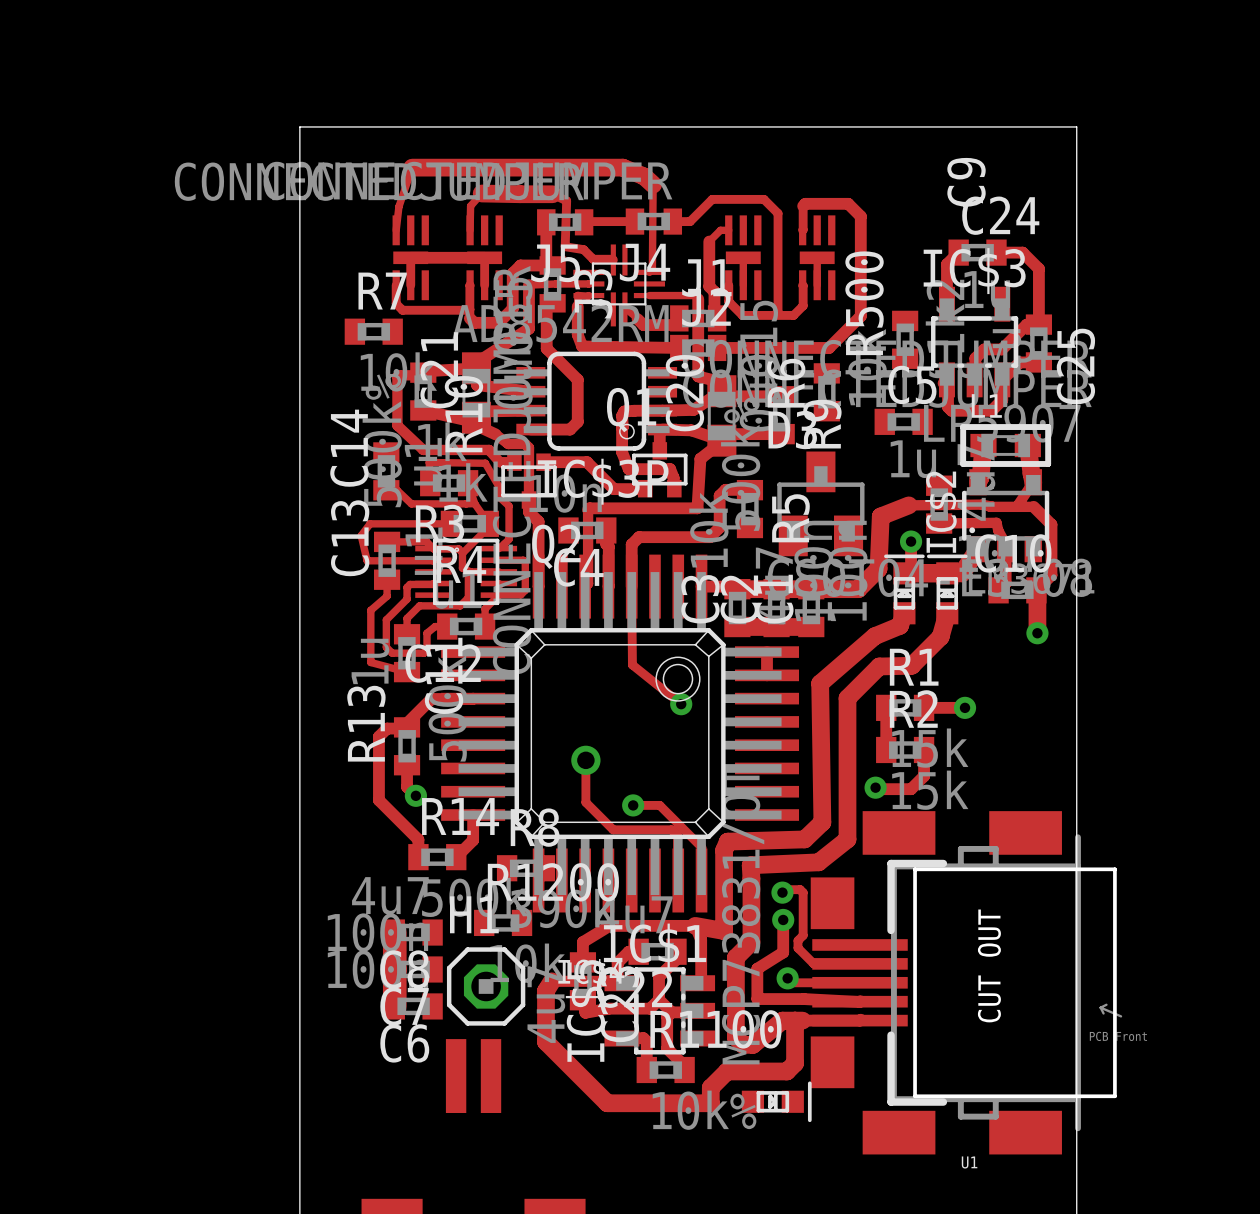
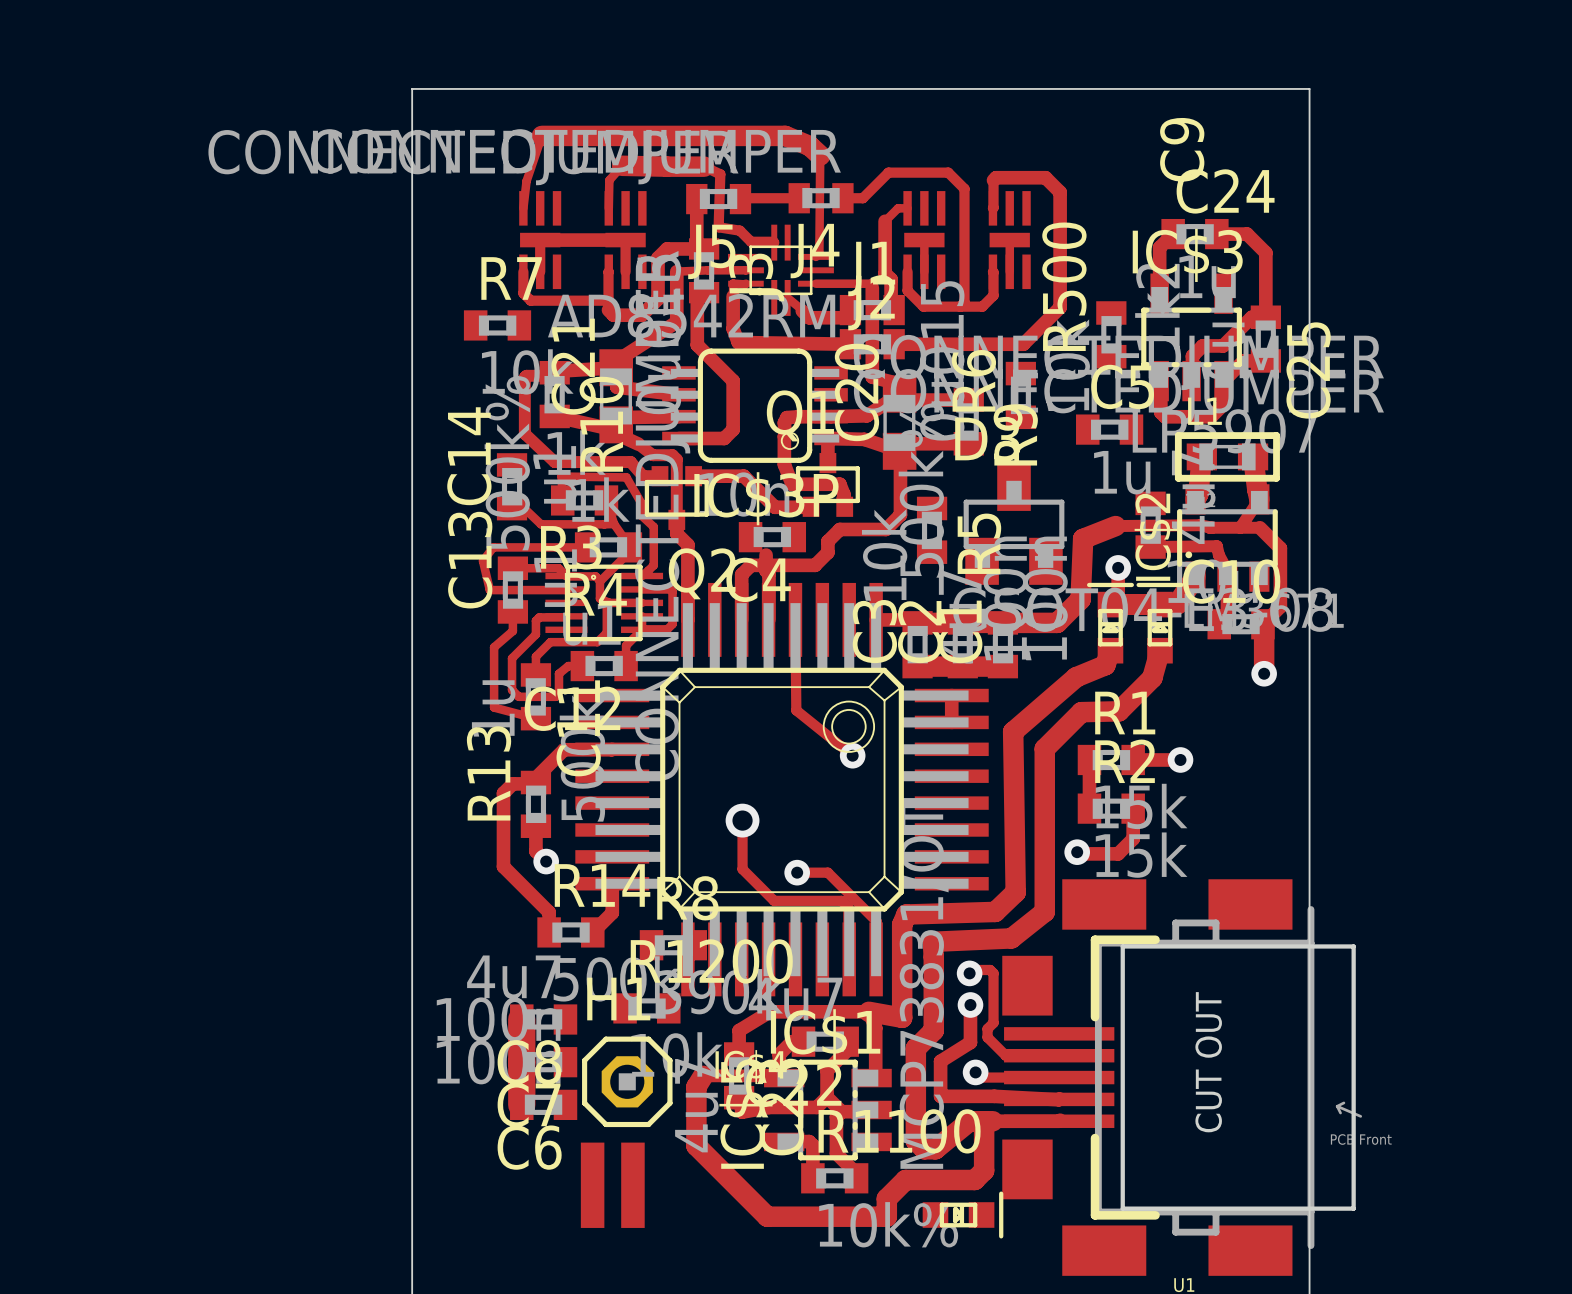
track: (722, 441) (700, 458) (697, 508) -> (900, 452) (900, 514) (885, 529) (871, 529)
track: (749, 489) (725, 489) (719, 495) (719, 527) (710, 537) (639, 537) (631, 544) (631, 586) -> none
track: (670, 508) (589, 508) (588, 583) (585, 586) -> (839, 529) (827, 541) (827, 552) (815, 565) (751, 565) (741, 574) (741, 619)
C4 position: (587, 530) -> (772, 537)

